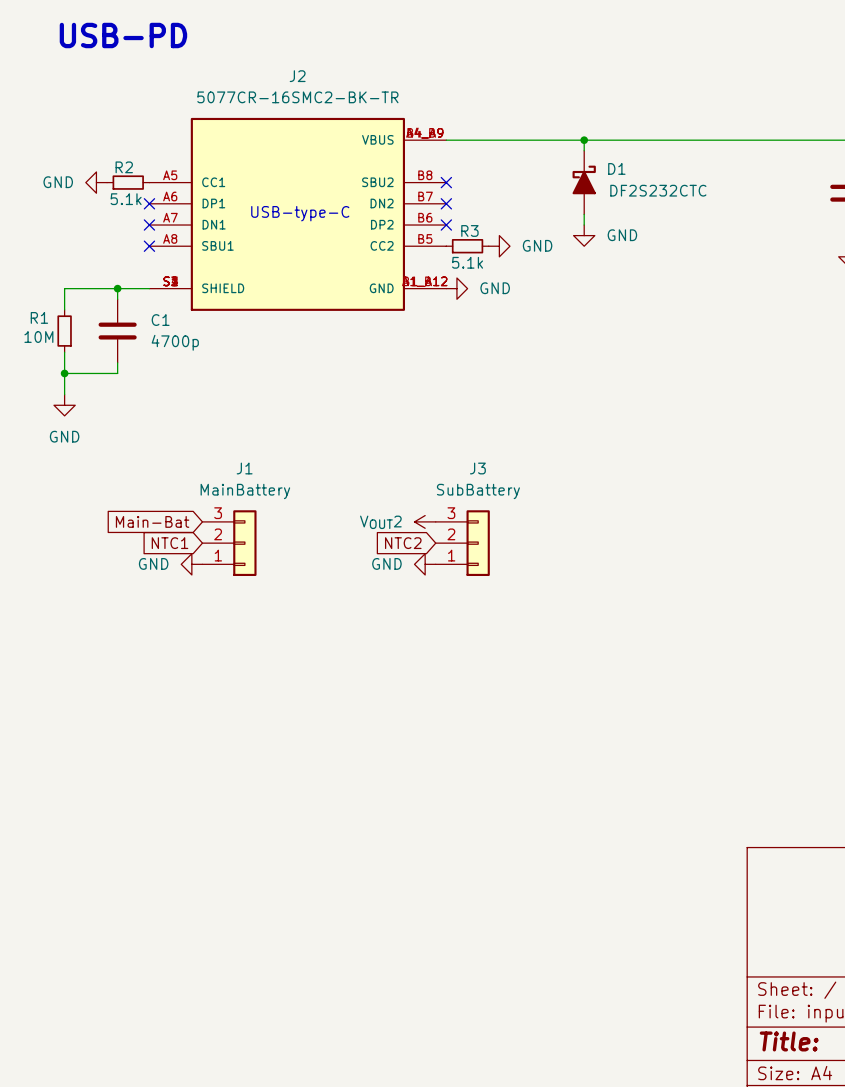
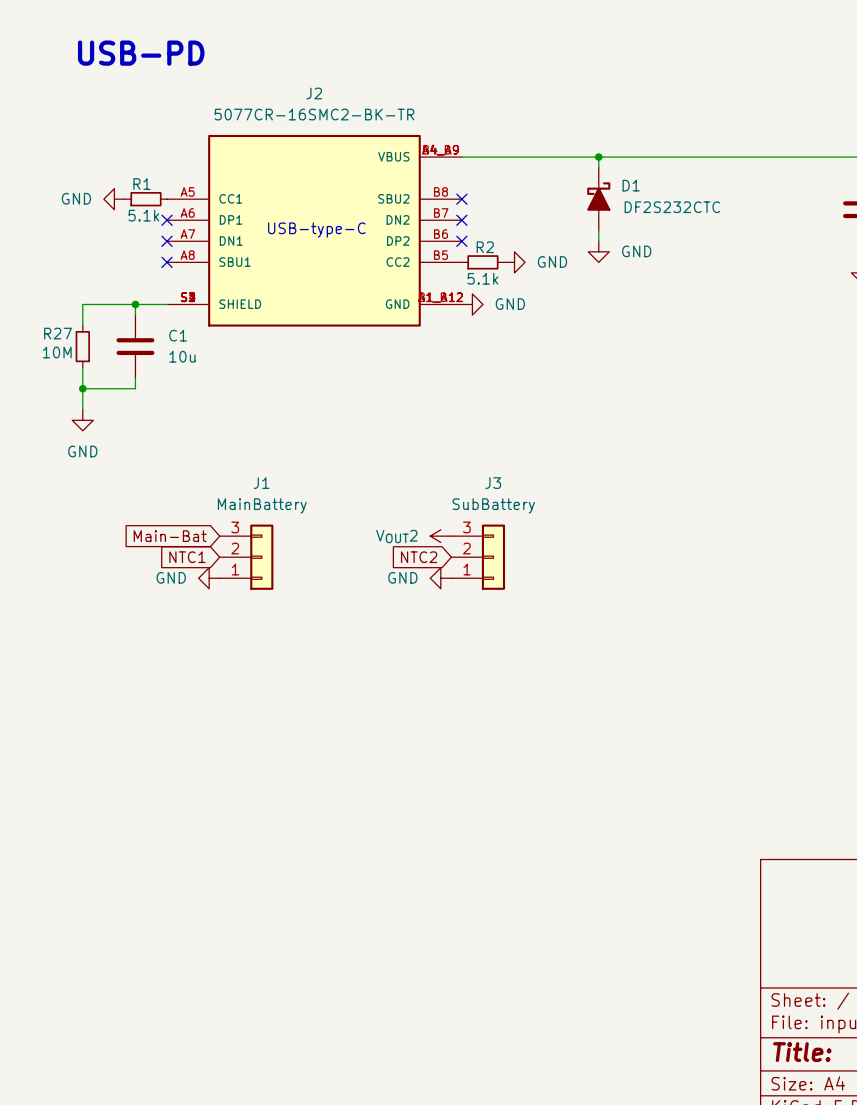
R2 name: R2 (124, 167) -> R1 (142, 184)
R3 name: R3 (469, 230) -> R2 (485, 247)
R1 name: R1 (39, 317) -> R27 (58, 333)
C1 value: 4700p (175, 342) -> 10u (182, 356)

